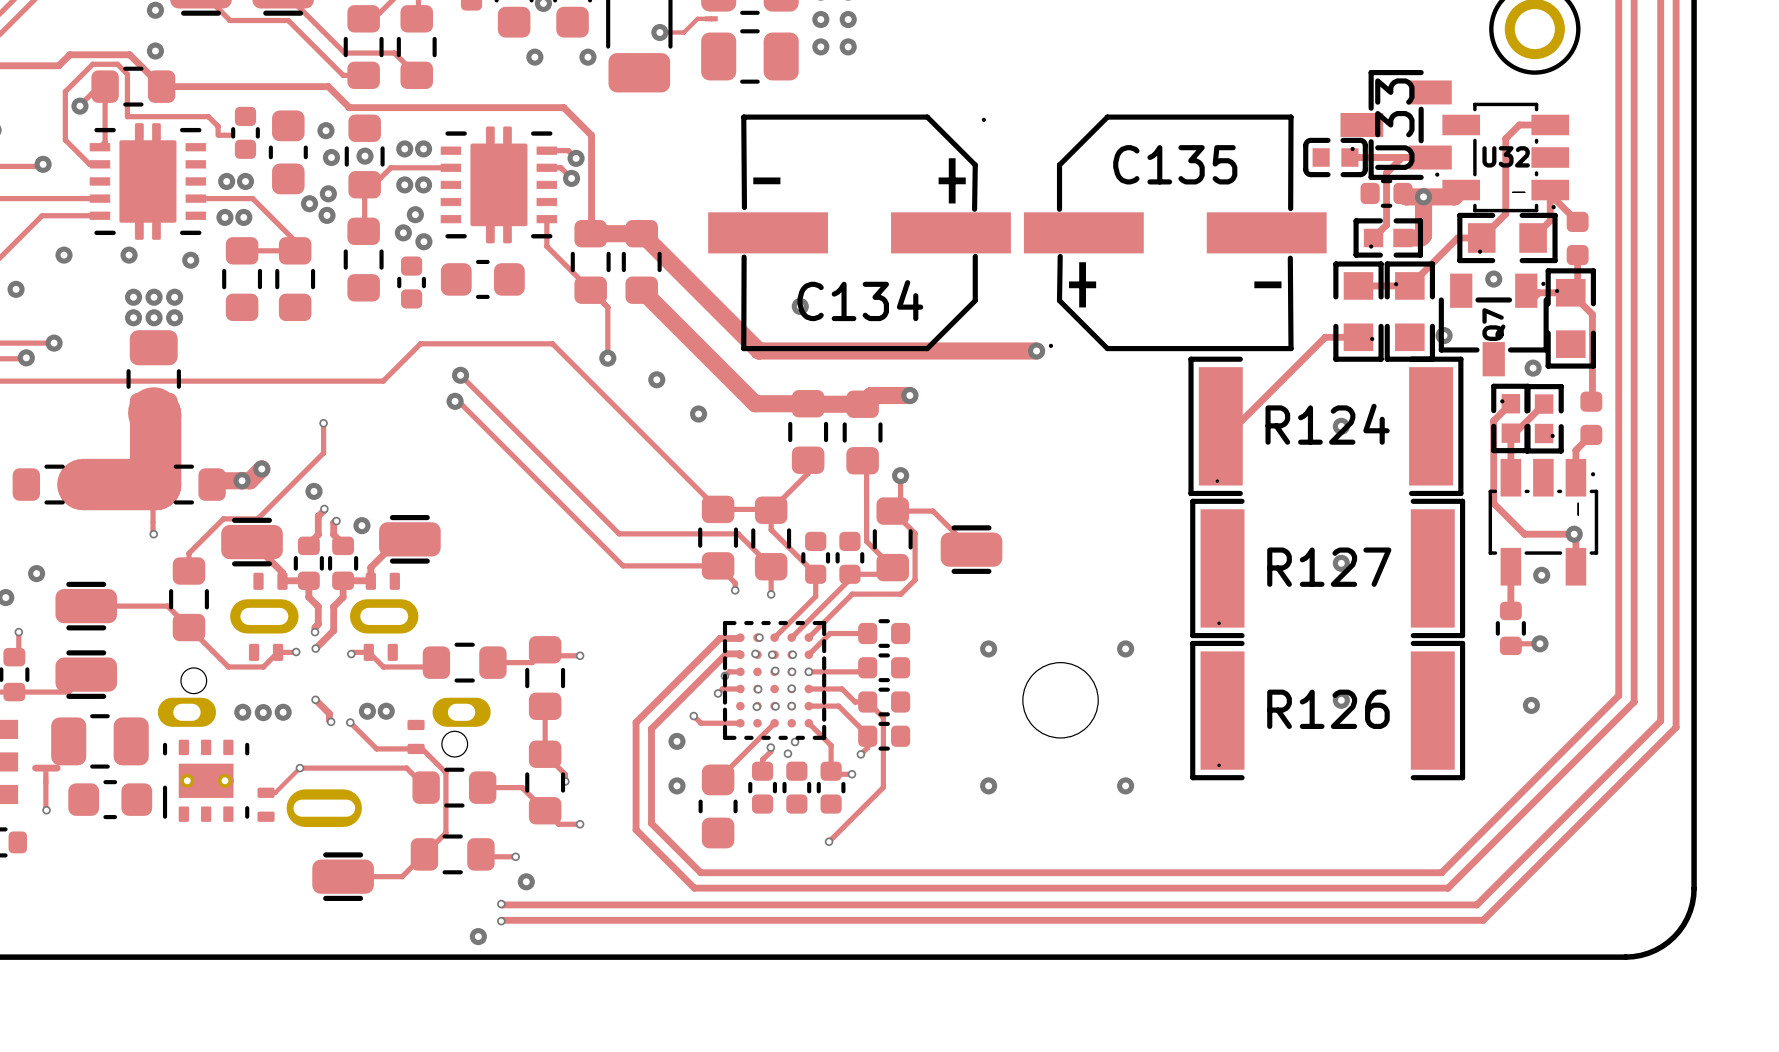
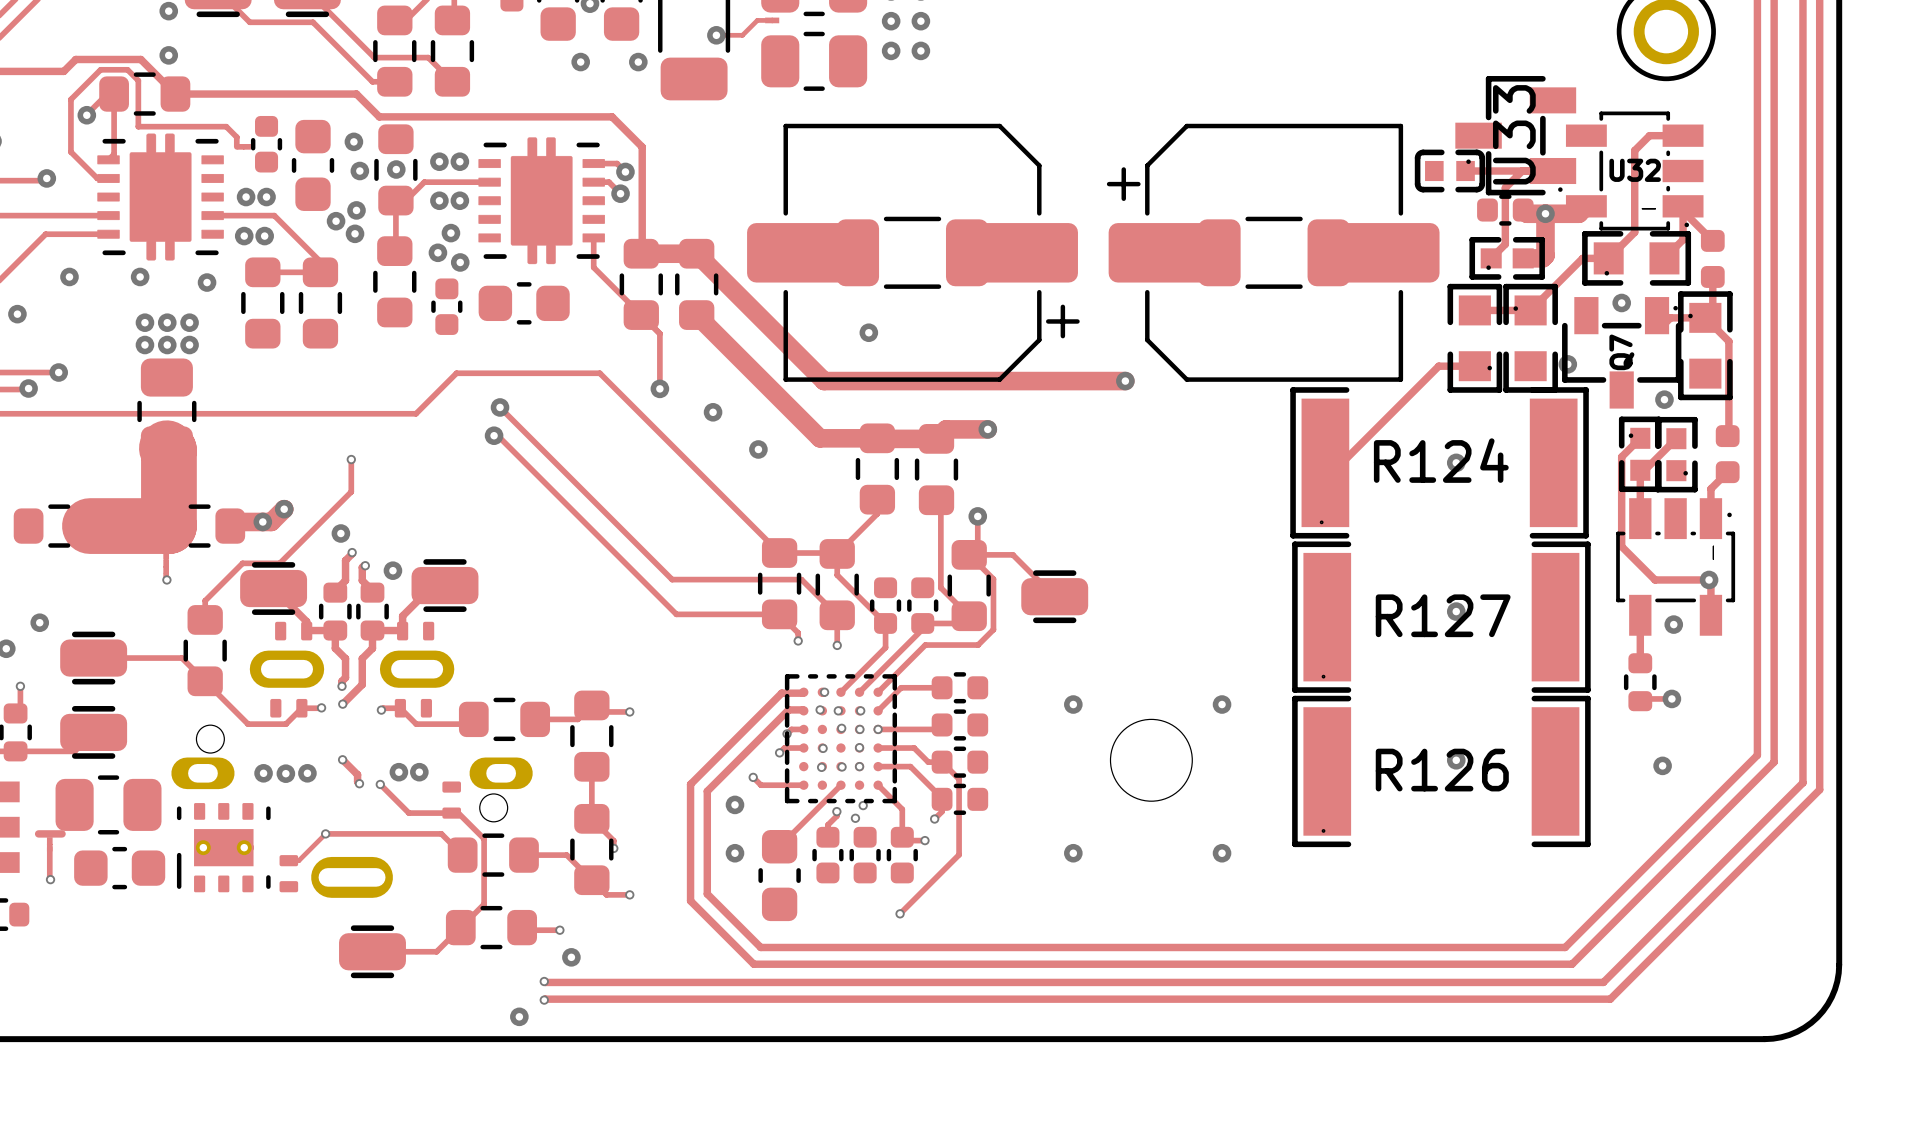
part: none -> (913, 252)
C134: (859, 232) -> none
part: none -> (1273, 252)
C135: (1175, 232) -> none

